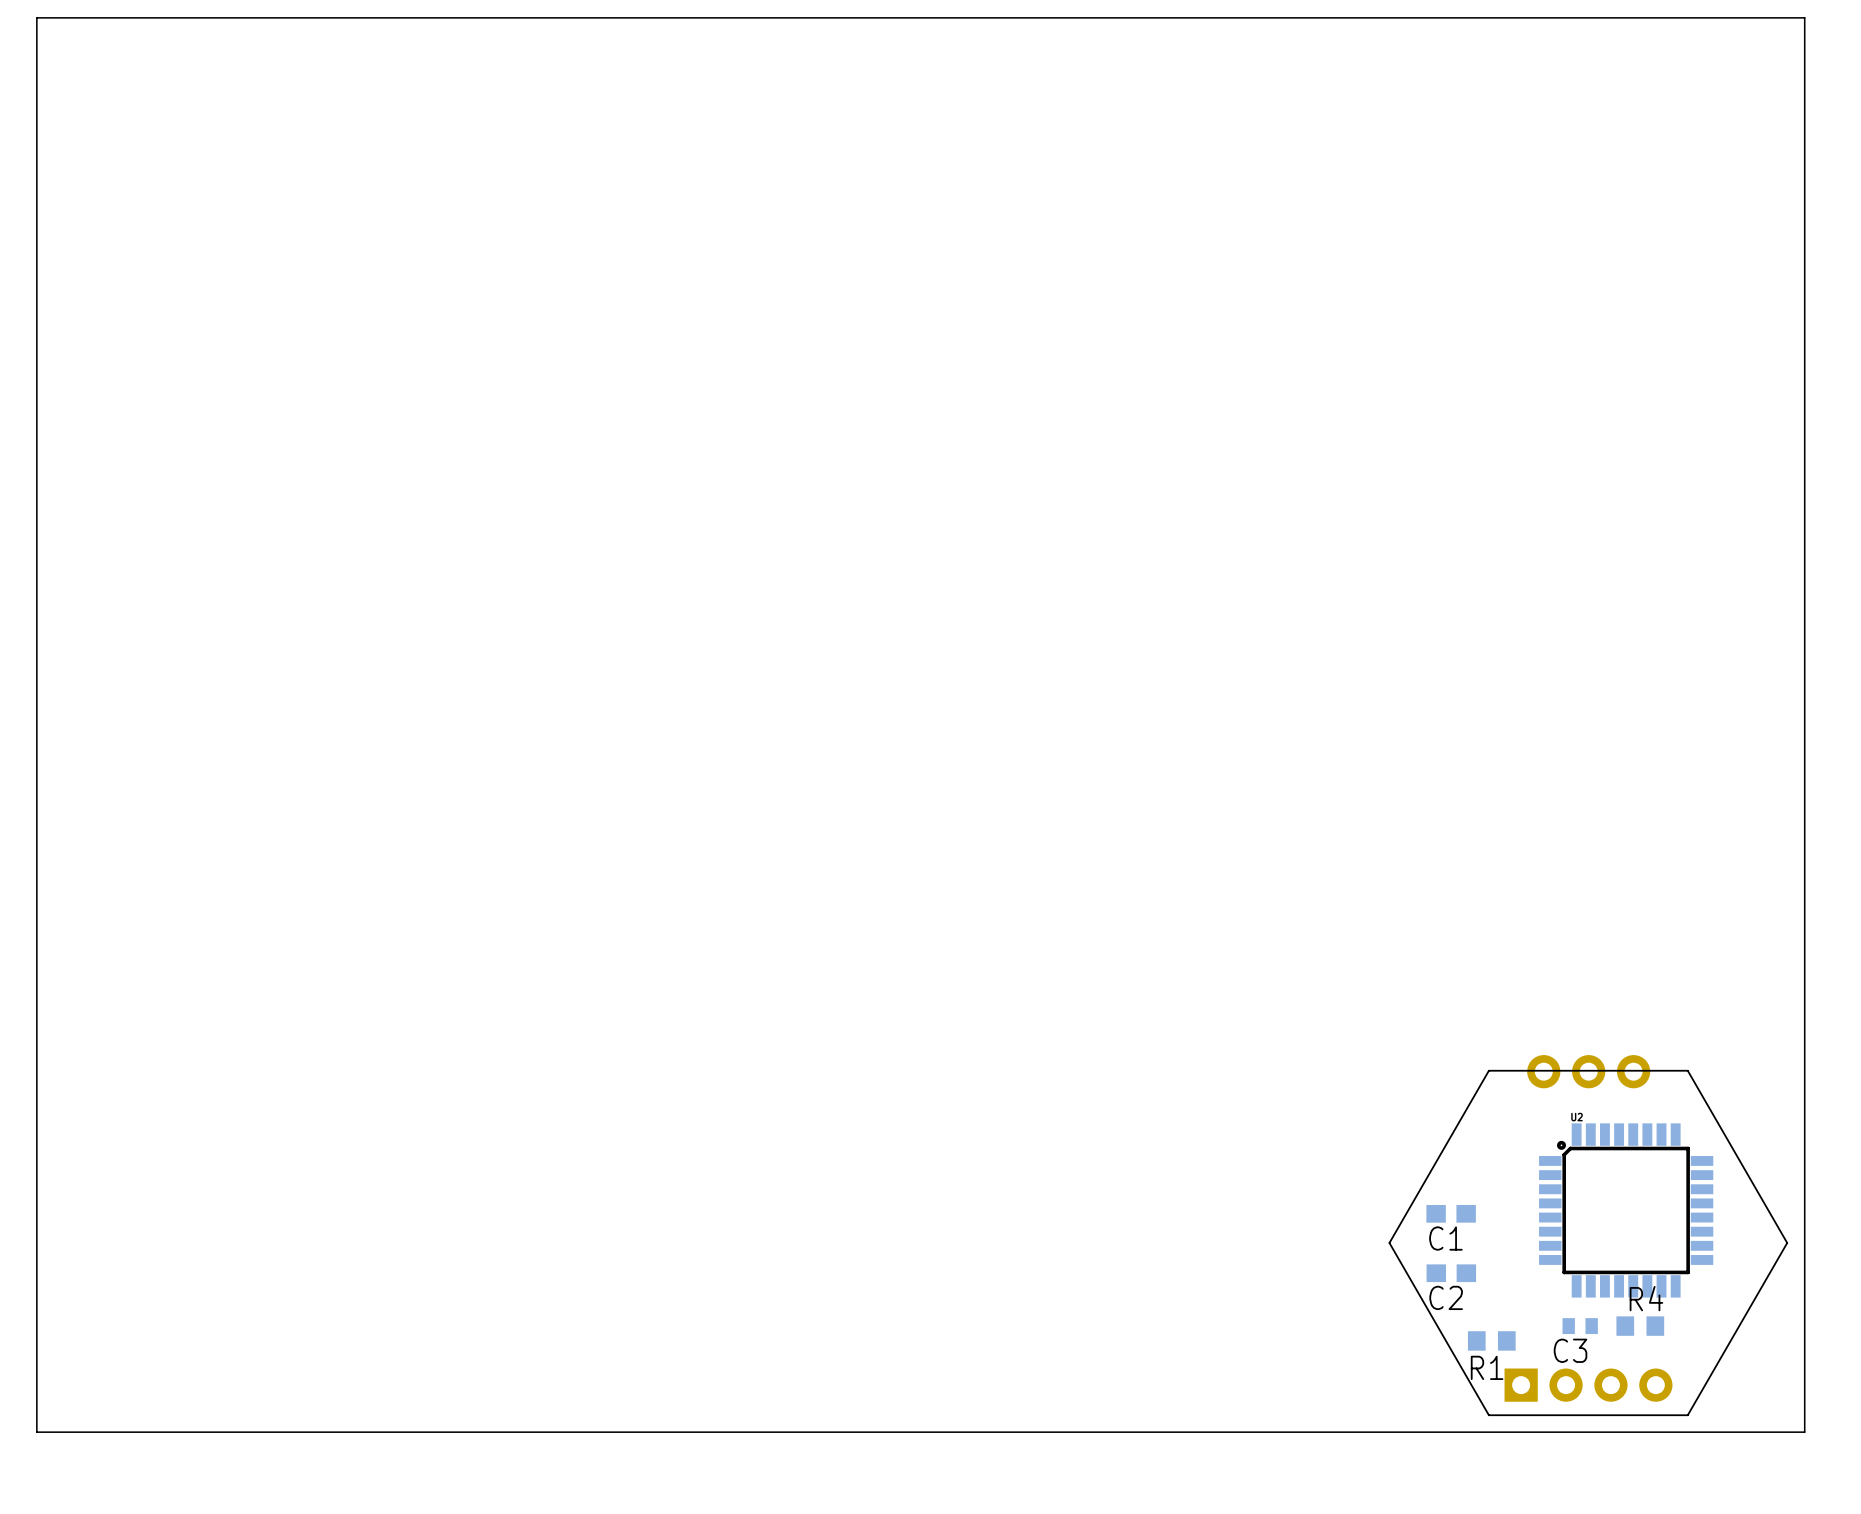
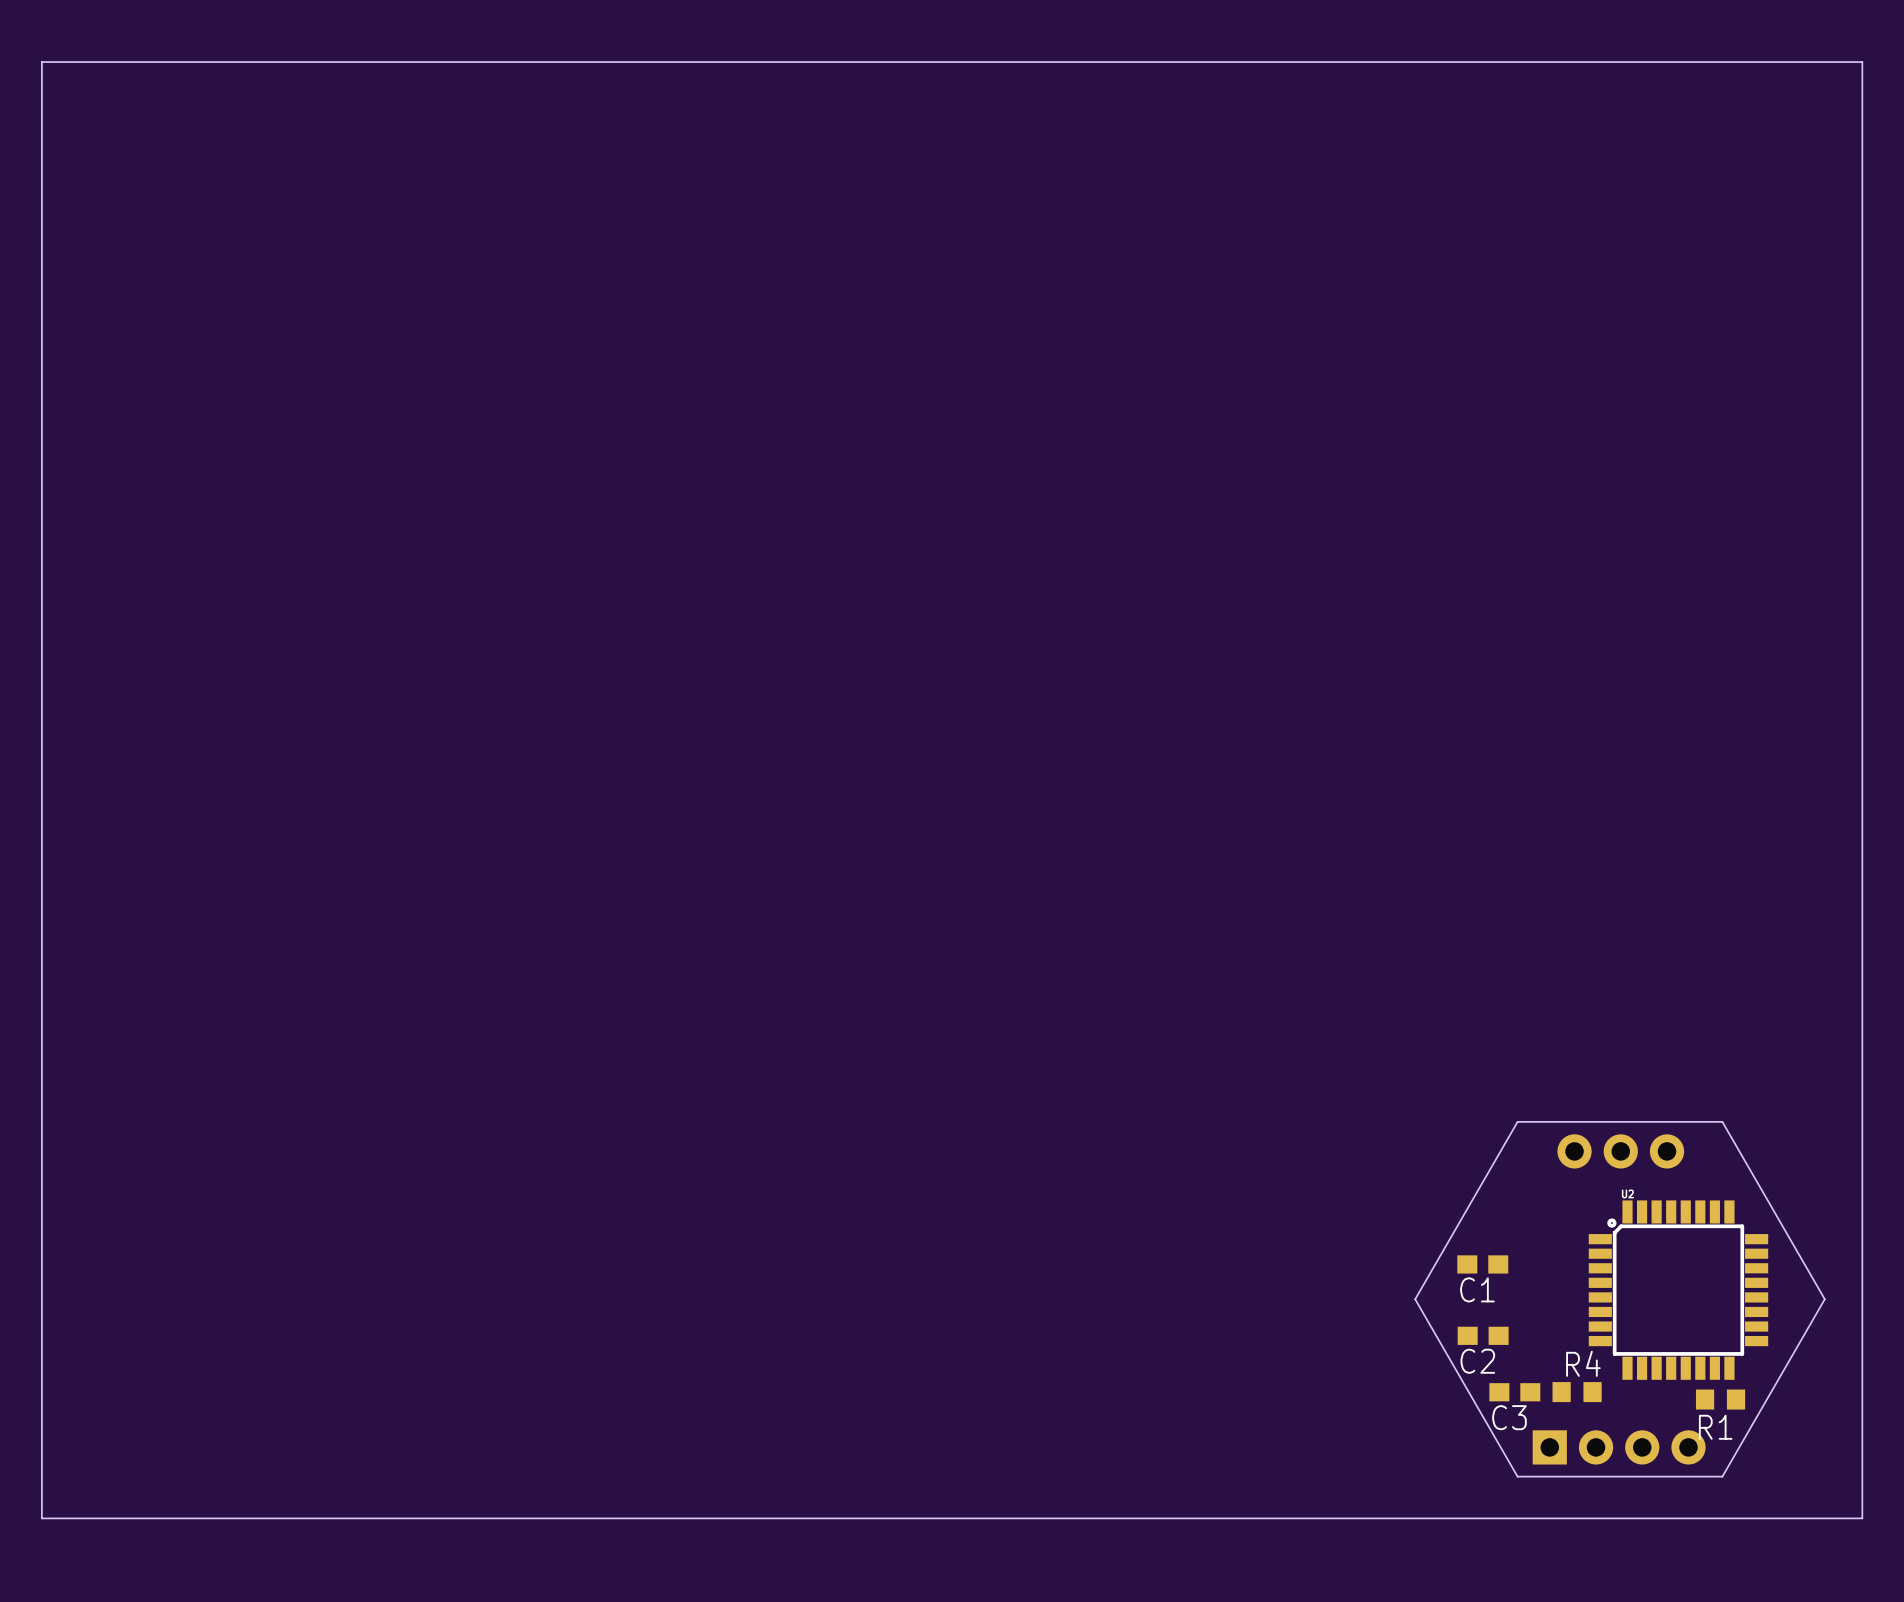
board edge: (1687, 1070) (1787, 1242) (1687, 1415) (1488, 1415) (1389, 1242) (1488, 1070) (1687, 1070) -> (1722, 1121) (1824, 1299) (1722, 1476) (1517, 1476) (1415, 1299) (1517, 1121) (1722, 1121)
part position: (1588, 1071) -> (1620, 1151)
C1 position: (1451, 1213) -> (1482, 1264)
C2 position: (1451, 1273) -> (1483, 1335)
C3 footprint: [1562, 1318, 1598, 1335] -> [1489, 1383, 1541, 1402]
R4 position: (1640, 1326) -> (1577, 1392)
R1 position: (1491, 1340) -> (1720, 1399)
part position: (1588, 1385) -> (1619, 1447)

